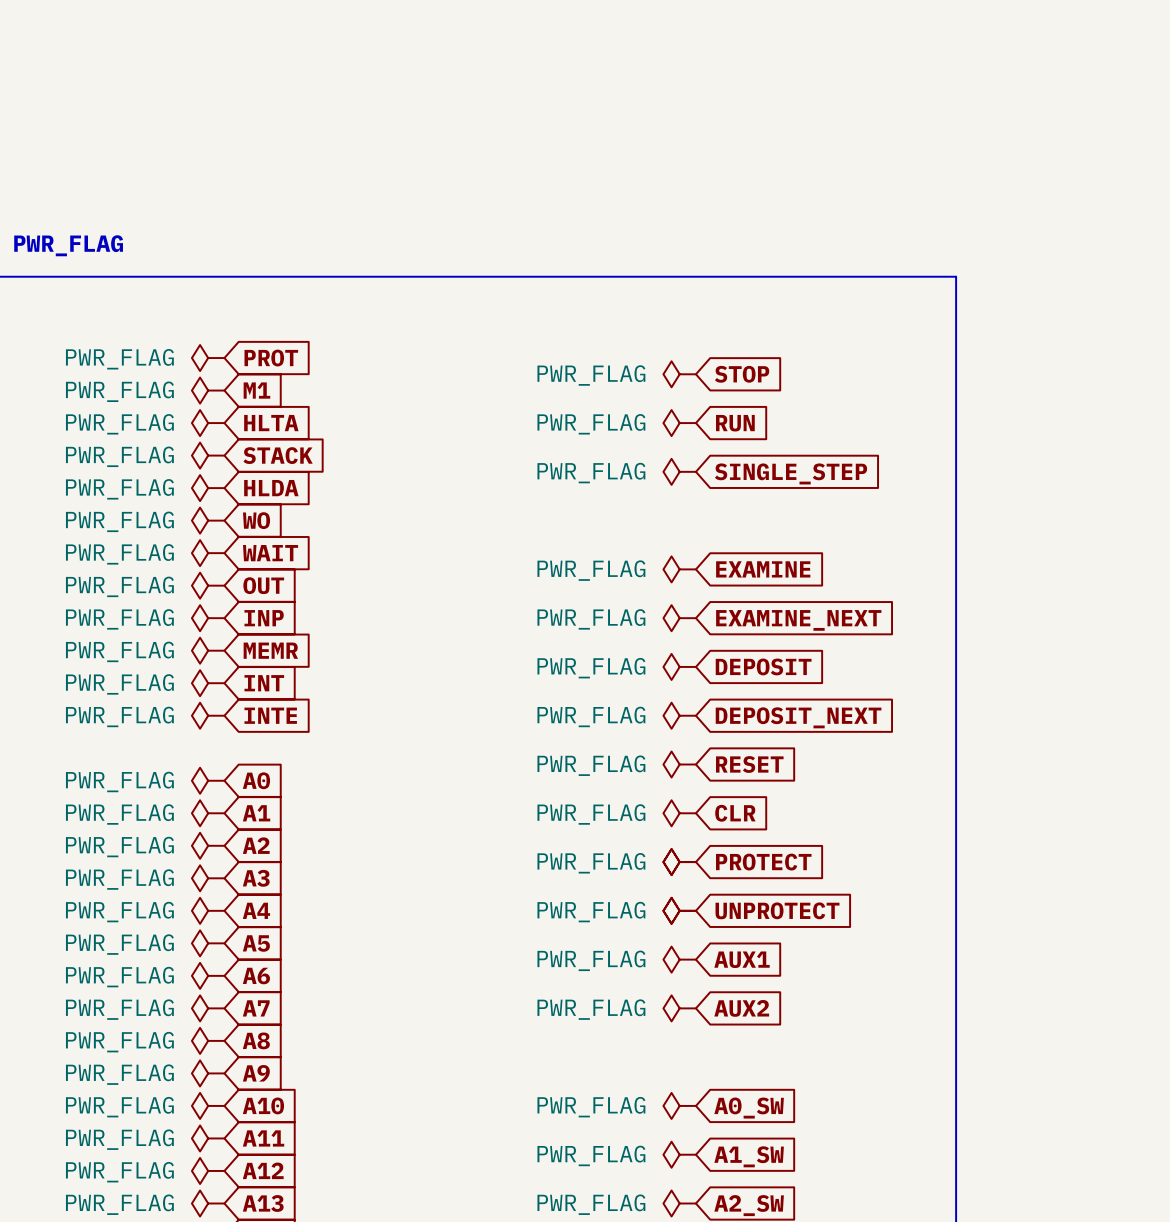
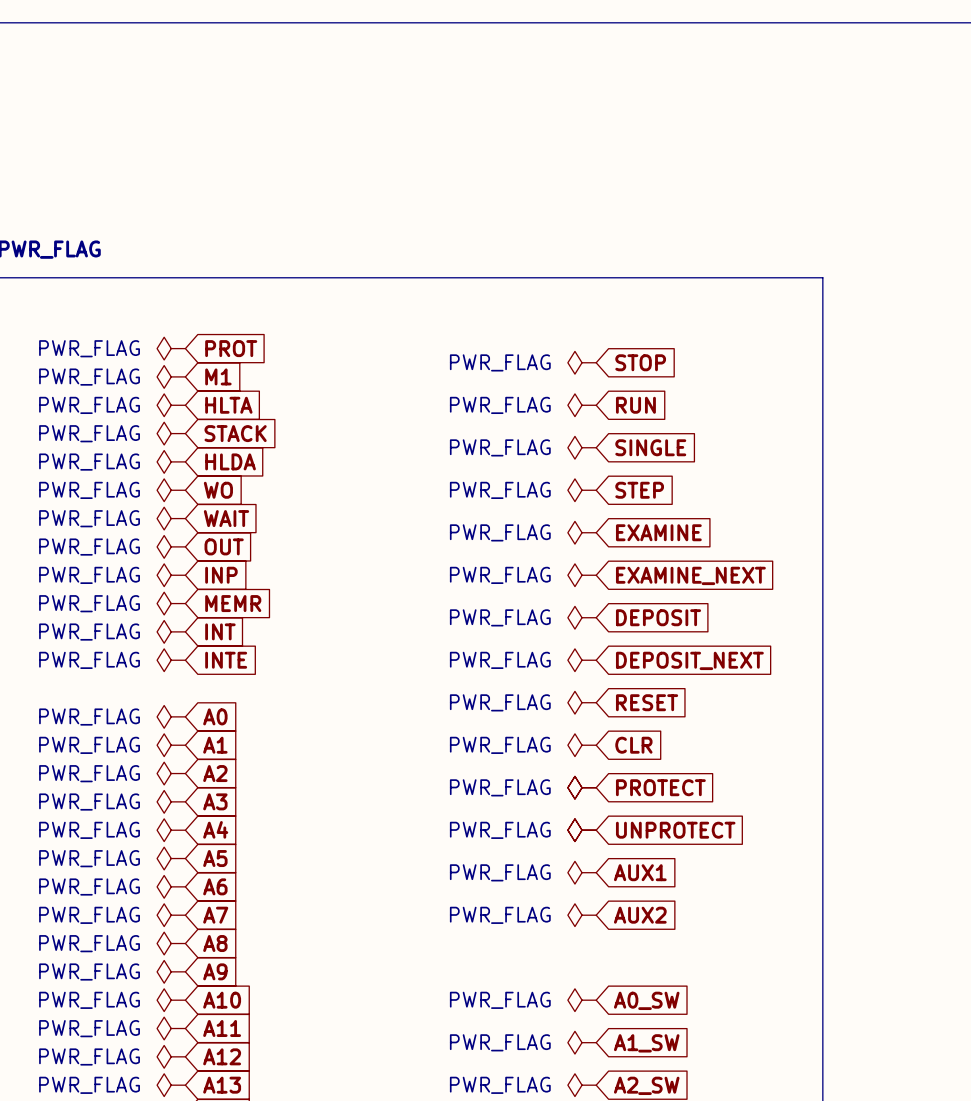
global label: SINGLE_STEP (791, 473) -> SINGLE (650, 447)
power symbol: none -> PWR_FLAG (582, 490)
global label: none -> STEP (639, 490)

